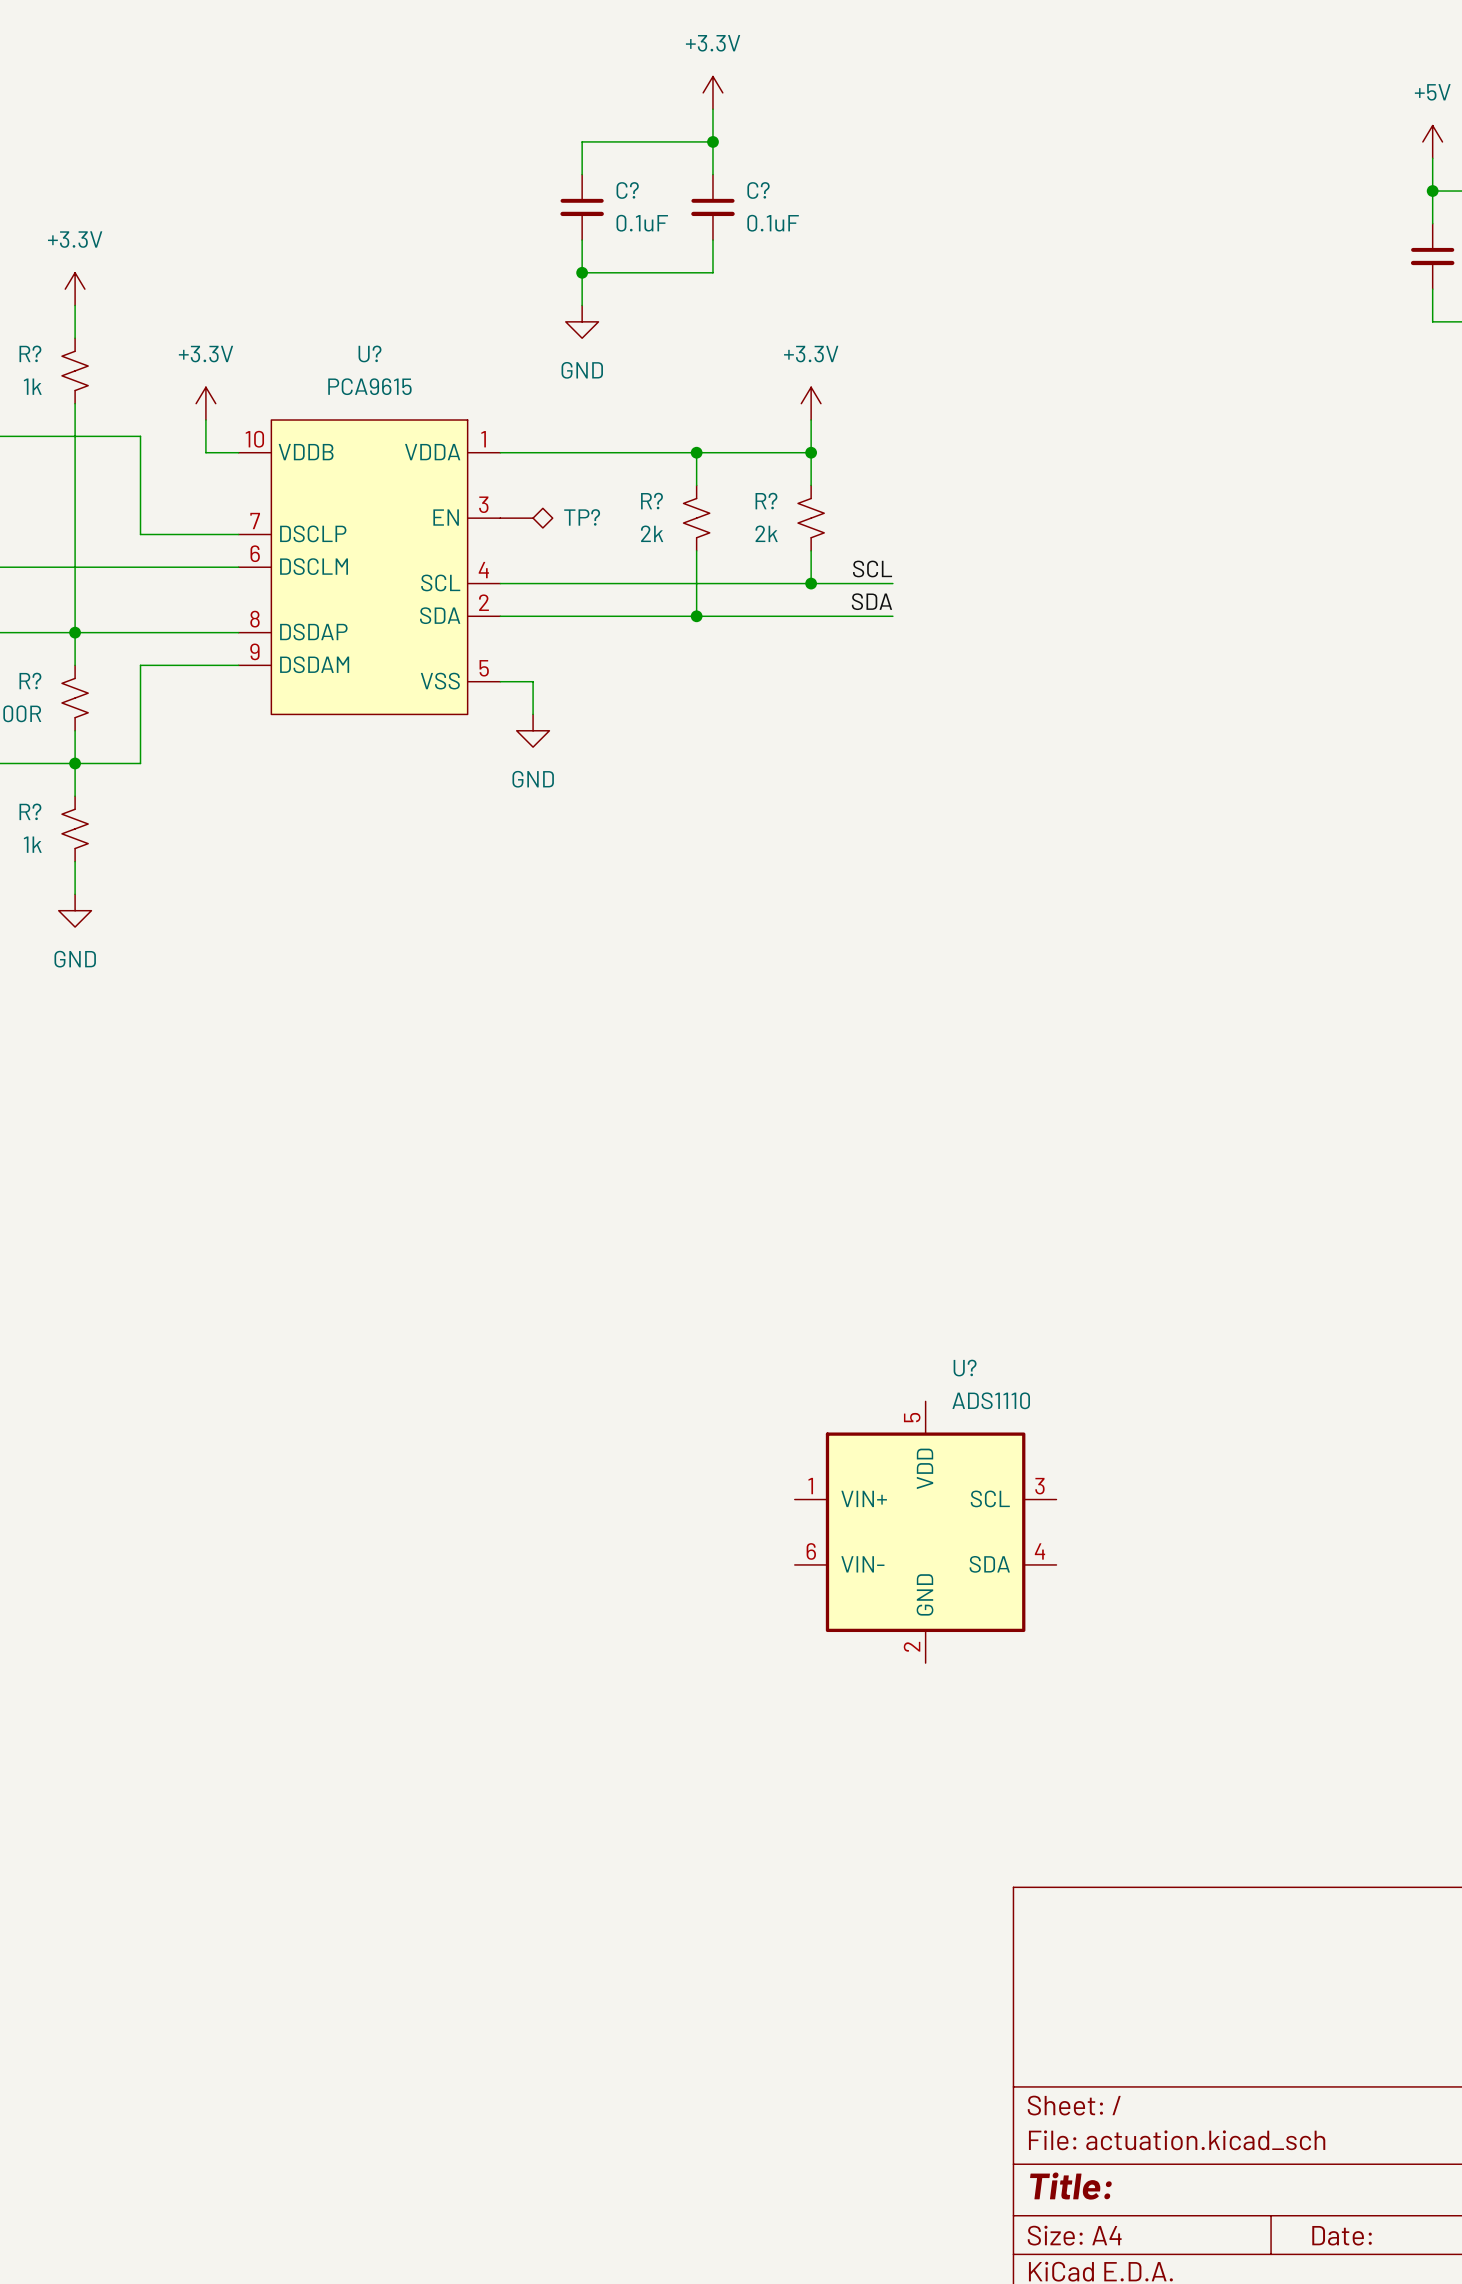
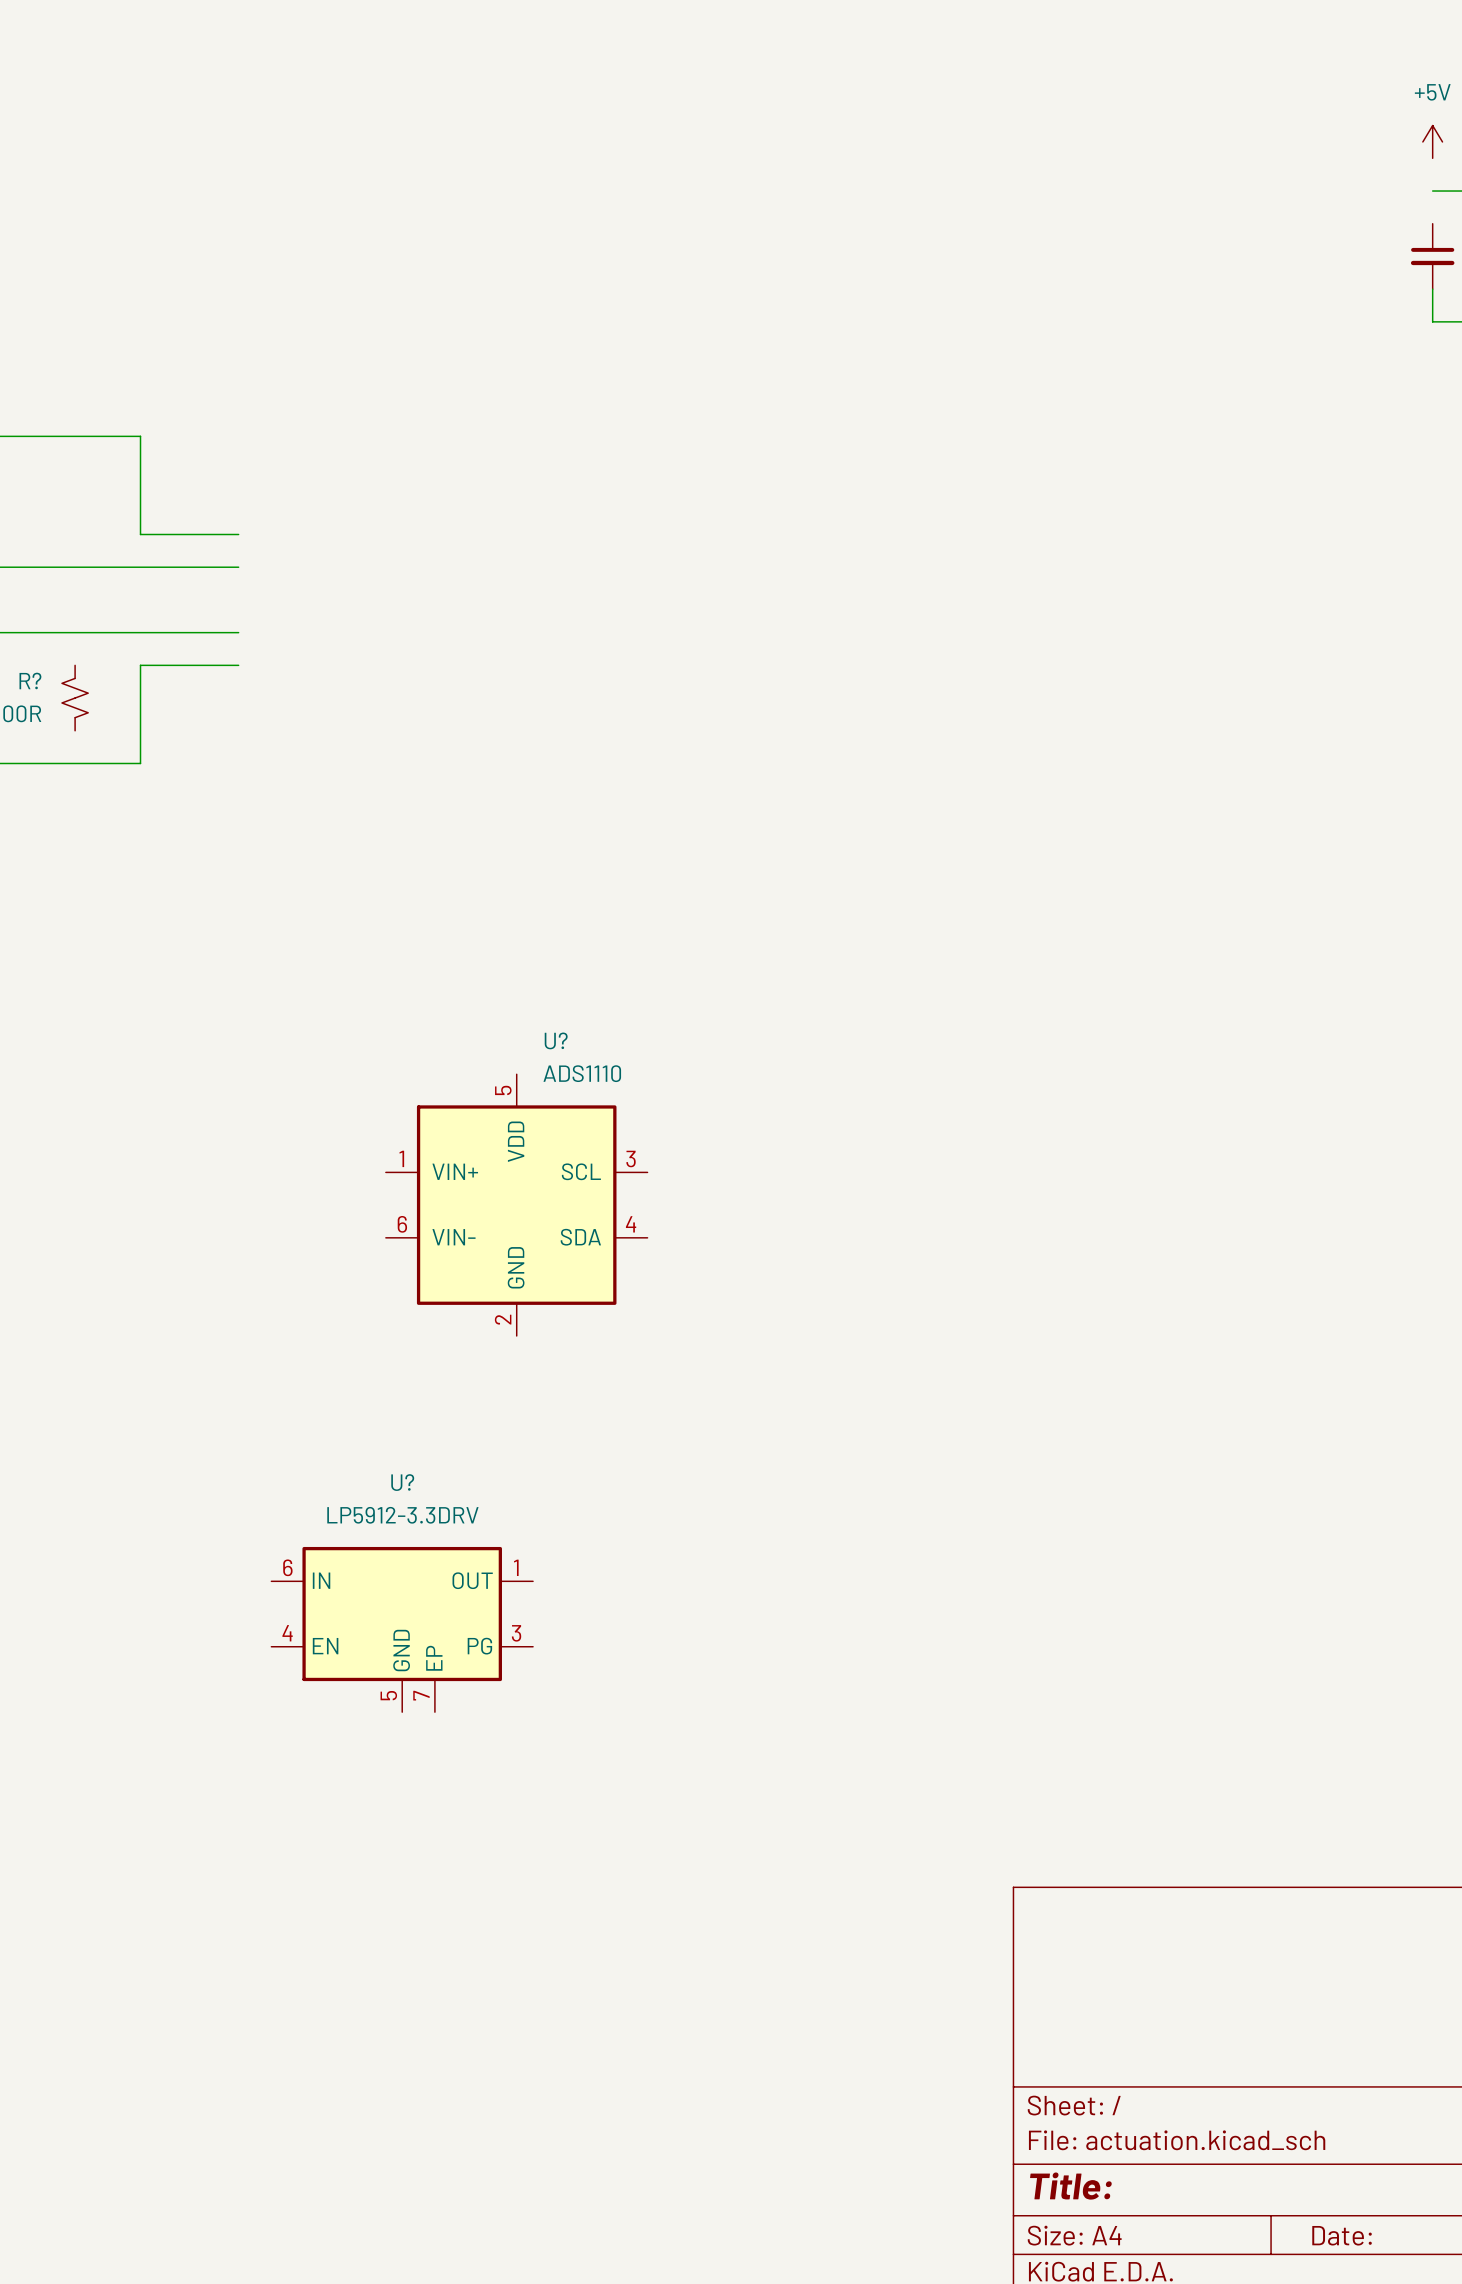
power symbol: +3.3V (712, 92) -> none
wire: (712, 109) (712, 174) -> none
wire: (712, 141) (582, 141) (582, 174) -> none
junction: (712, 141) -> none
wire: (1432, 158) (1432, 223) -> none
junction: (1432, 191) -> none
C?: 0.1uF (582, 207) -> none
C?: 0.1uF (712, 207) -> none
wire: (582, 240) (582, 305) -> none
wire: (712, 240) (712, 272) (582, 272) -> none
junction: (582, 272) -> none
power symbol: +3.3V (75, 289) -> none
wire: (75, 305) (75, 338) -> none
power symbol: GND (582, 321) -> none
R?: 1k (75, 370) -> none
wire: (75, 403) (75, 665) -> none
power symbol: +3.3V (205, 403) -> none
power symbol: +3.3V (811, 403) -> none
wire: (205, 420) (205, 452) (238, 452) -> none
wire: (811, 420) (811, 485) -> none
wire: (500, 452) (811, 452) -> none
wire: (696, 452) (696, 485) -> none
junction: (696, 452) -> none
junction: (811, 452) -> none
TP?: (526, 518) -> none
R?: 2k (696, 518) -> none
R?: 2k (811, 518) -> none
wire: (696, 550) (696, 616) -> none
wire: (811, 550) (811, 583) -> none
U?: PCA9615 (369, 567) -> none
label: SCL (872, 568) -> none
wire: (500, 583) (892, 583) -> none
junction: (811, 583) -> none
label: SDA (871, 601) -> none
wire: (500, 616) (892, 616) -> none
junction: (696, 616) -> none
junction: (75, 632) -> none
wire: (500, 681) (533, 681) (533, 714) -> none
wire: (75, 730) (75, 796) -> none
power symbol: GND (533, 730) -> none
junction: (75, 763) -> none
R?: 1k (75, 828) -> none
wire: (75, 861) (75, 894) -> none
power symbol: GND (75, 910) -> none
U?: none -> ADS1110 (516, 1205)
U?: ADS1110 (925, 1532) -> none
U?: none -> LP5912-3.3DRV (402, 1629)

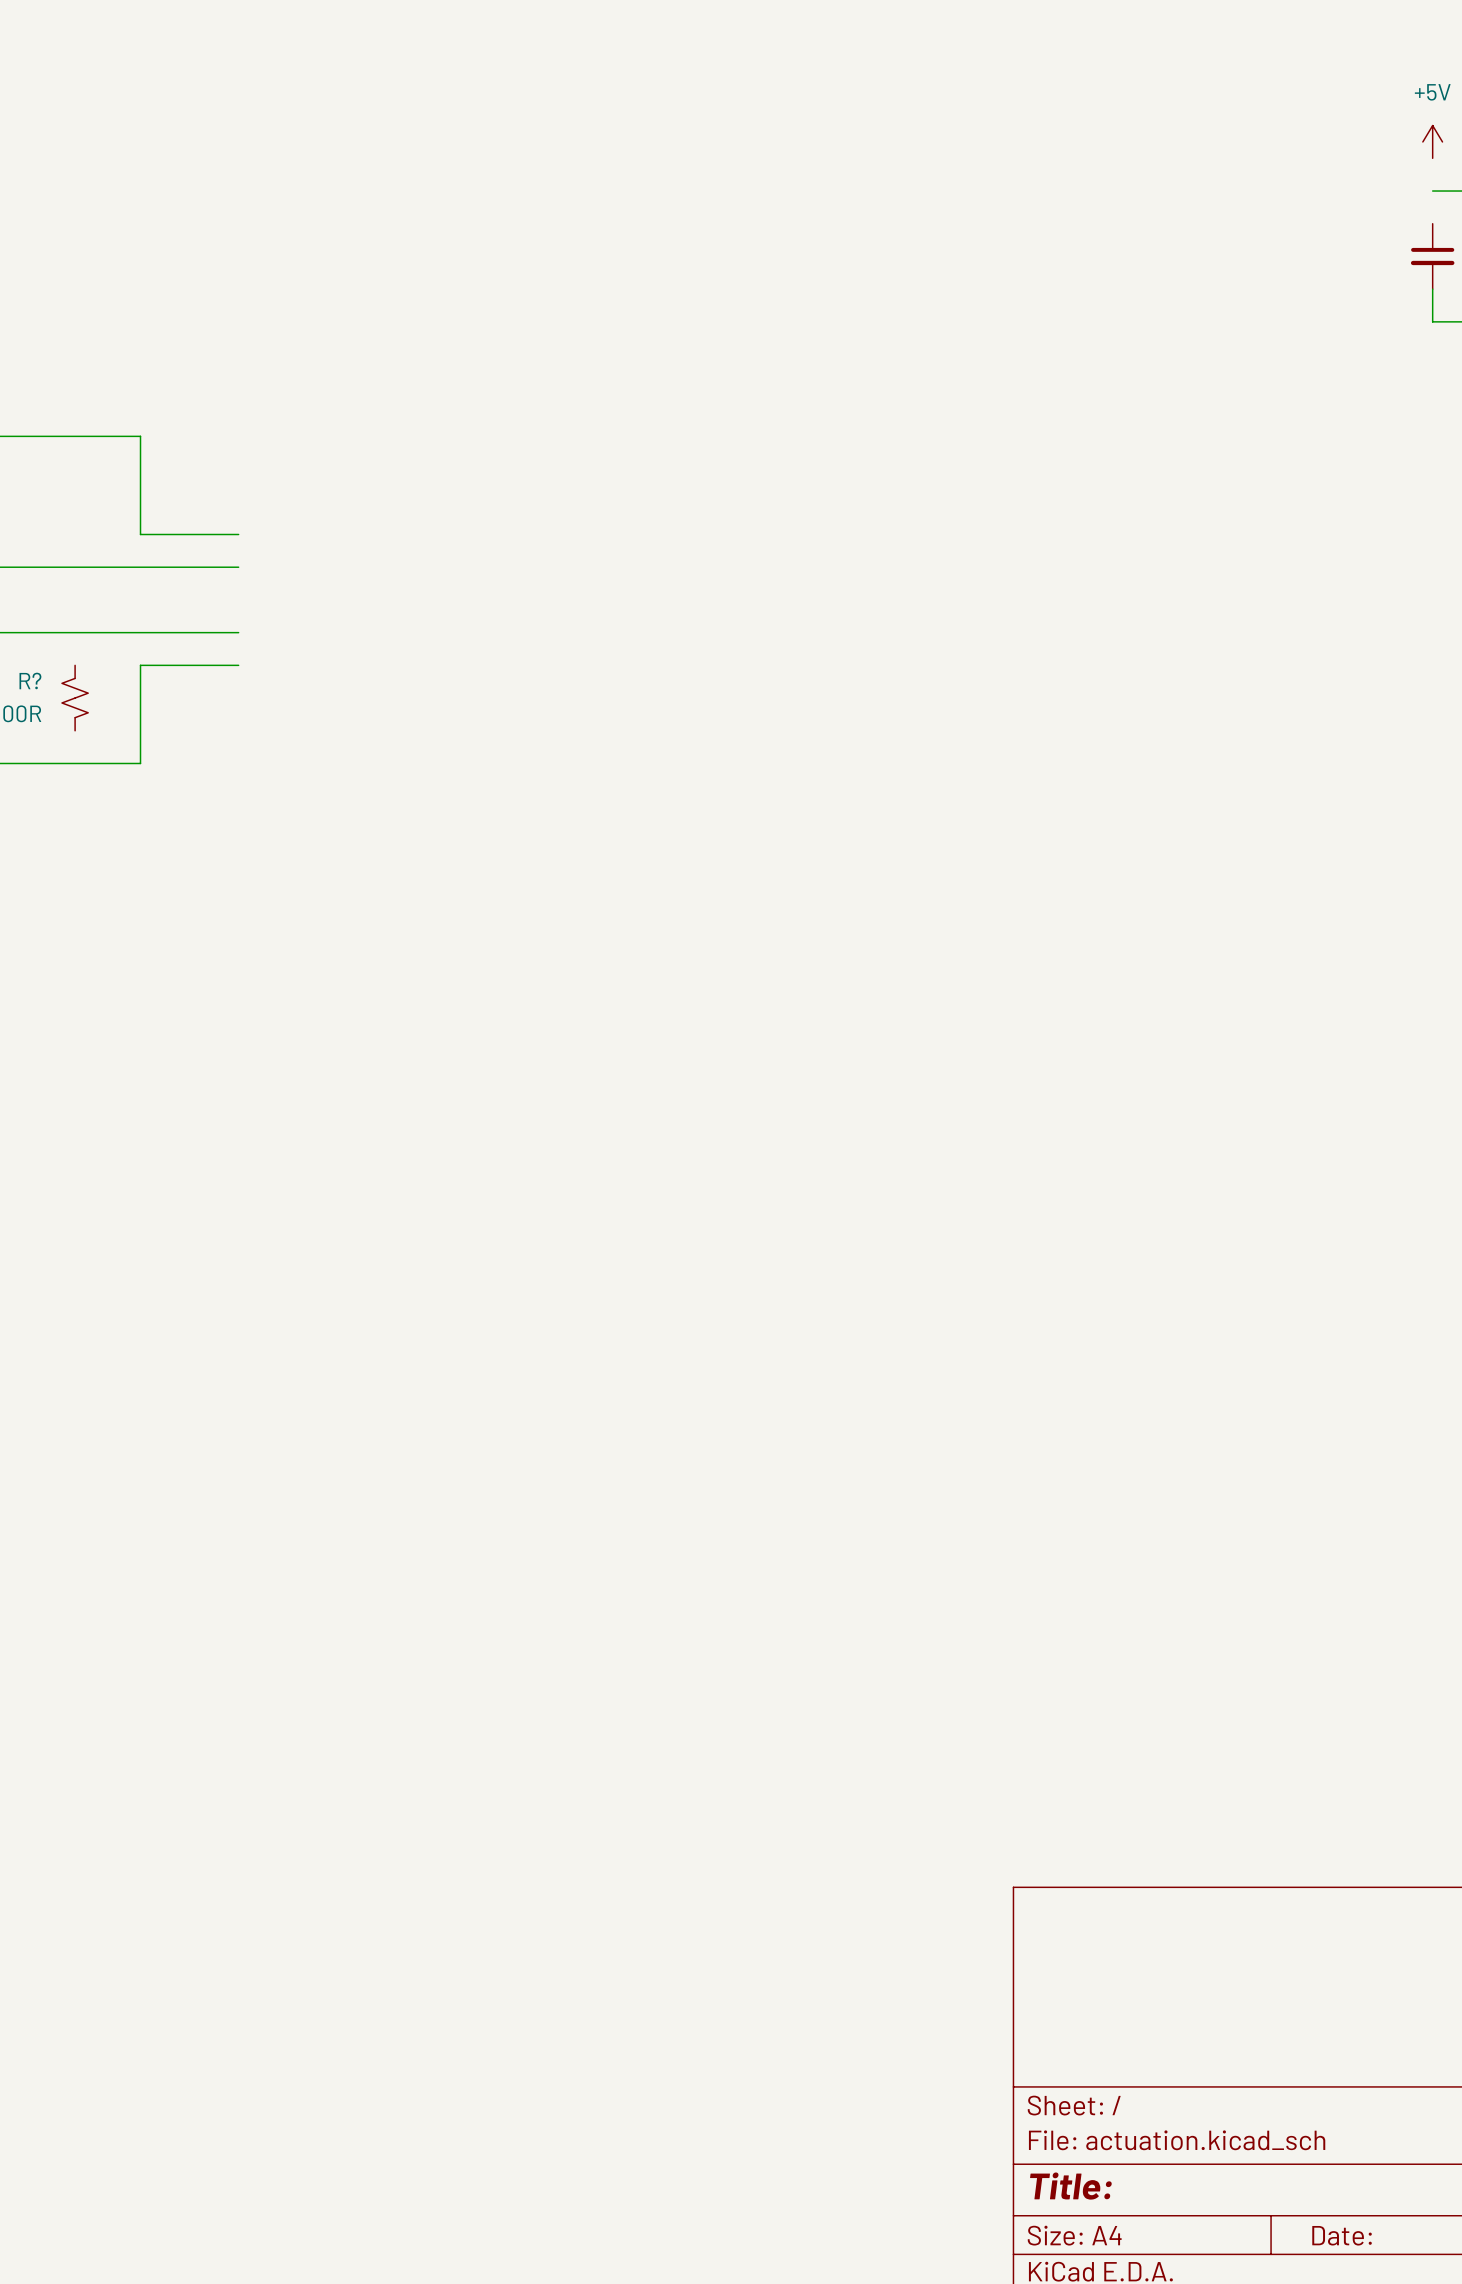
U?: ADS1110 (516, 1205) -> none
U?: LP5912-3.3DRV (402, 1629) -> none

